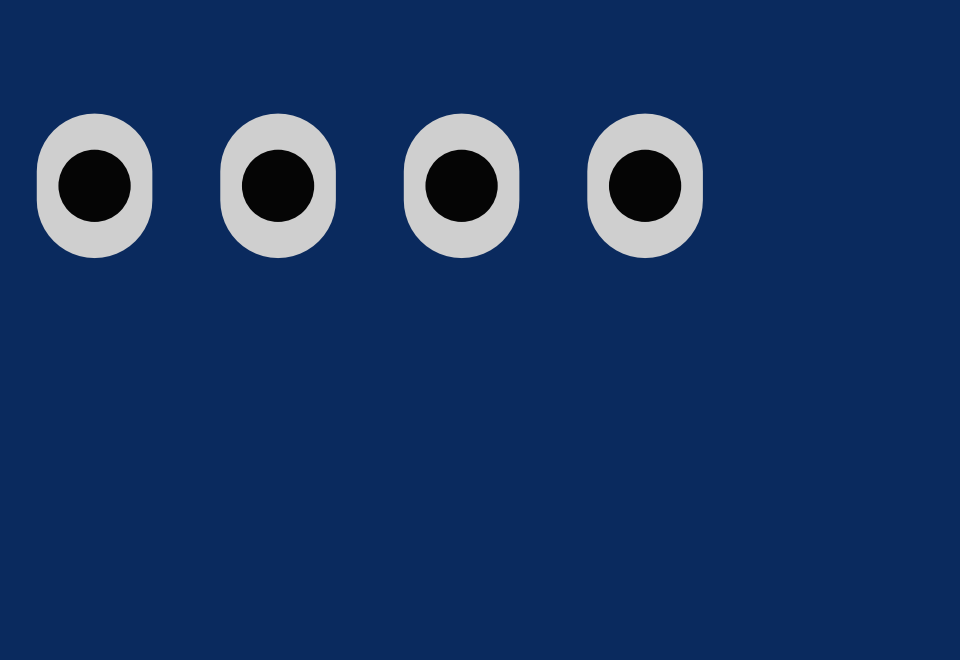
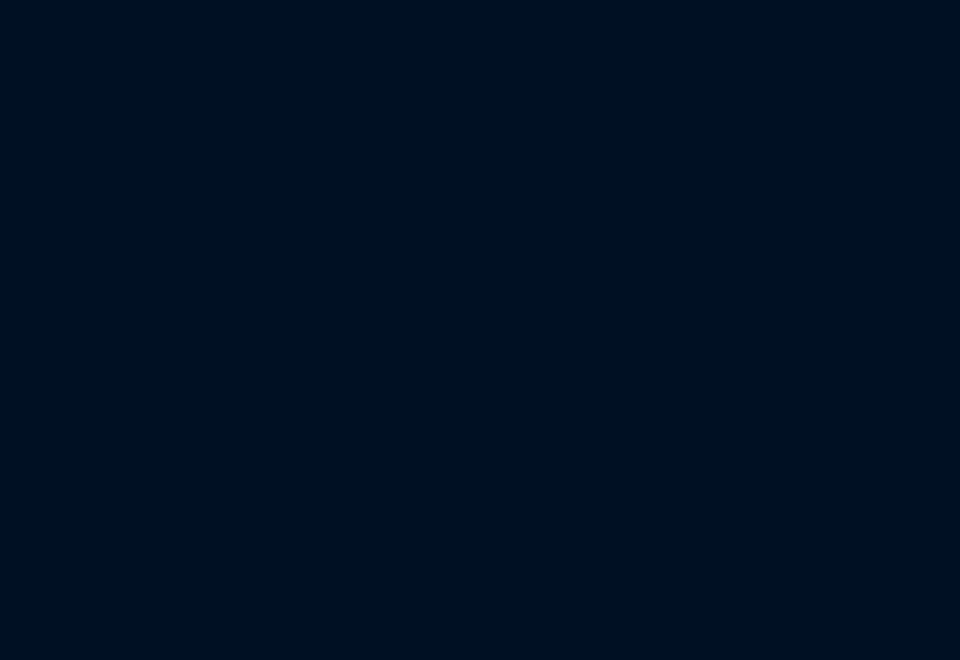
part: (369, 185) -> none

